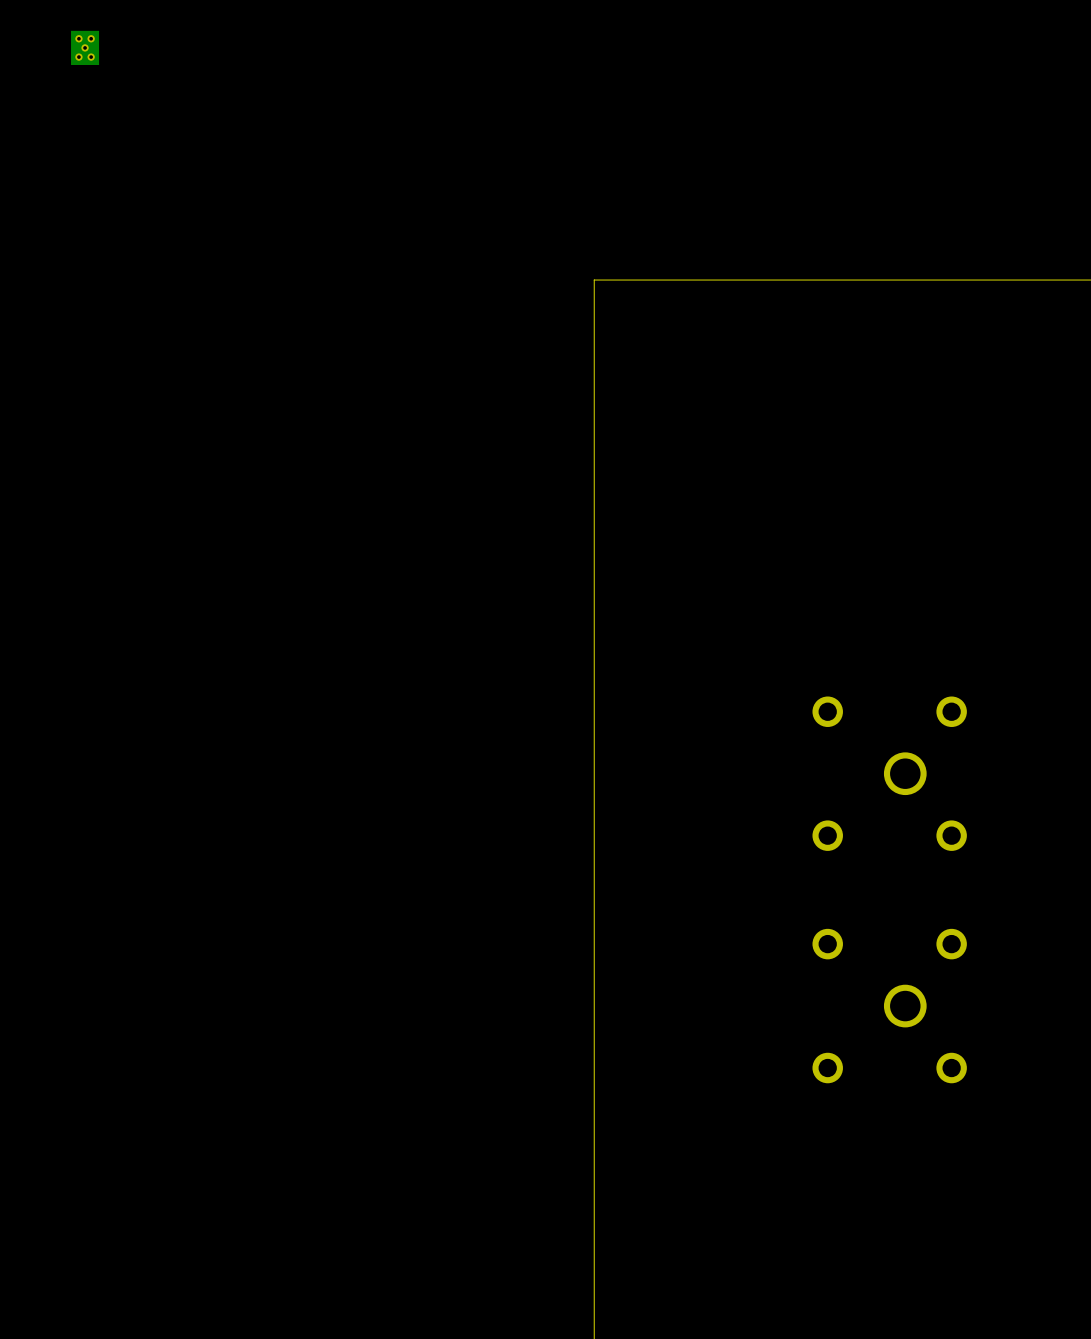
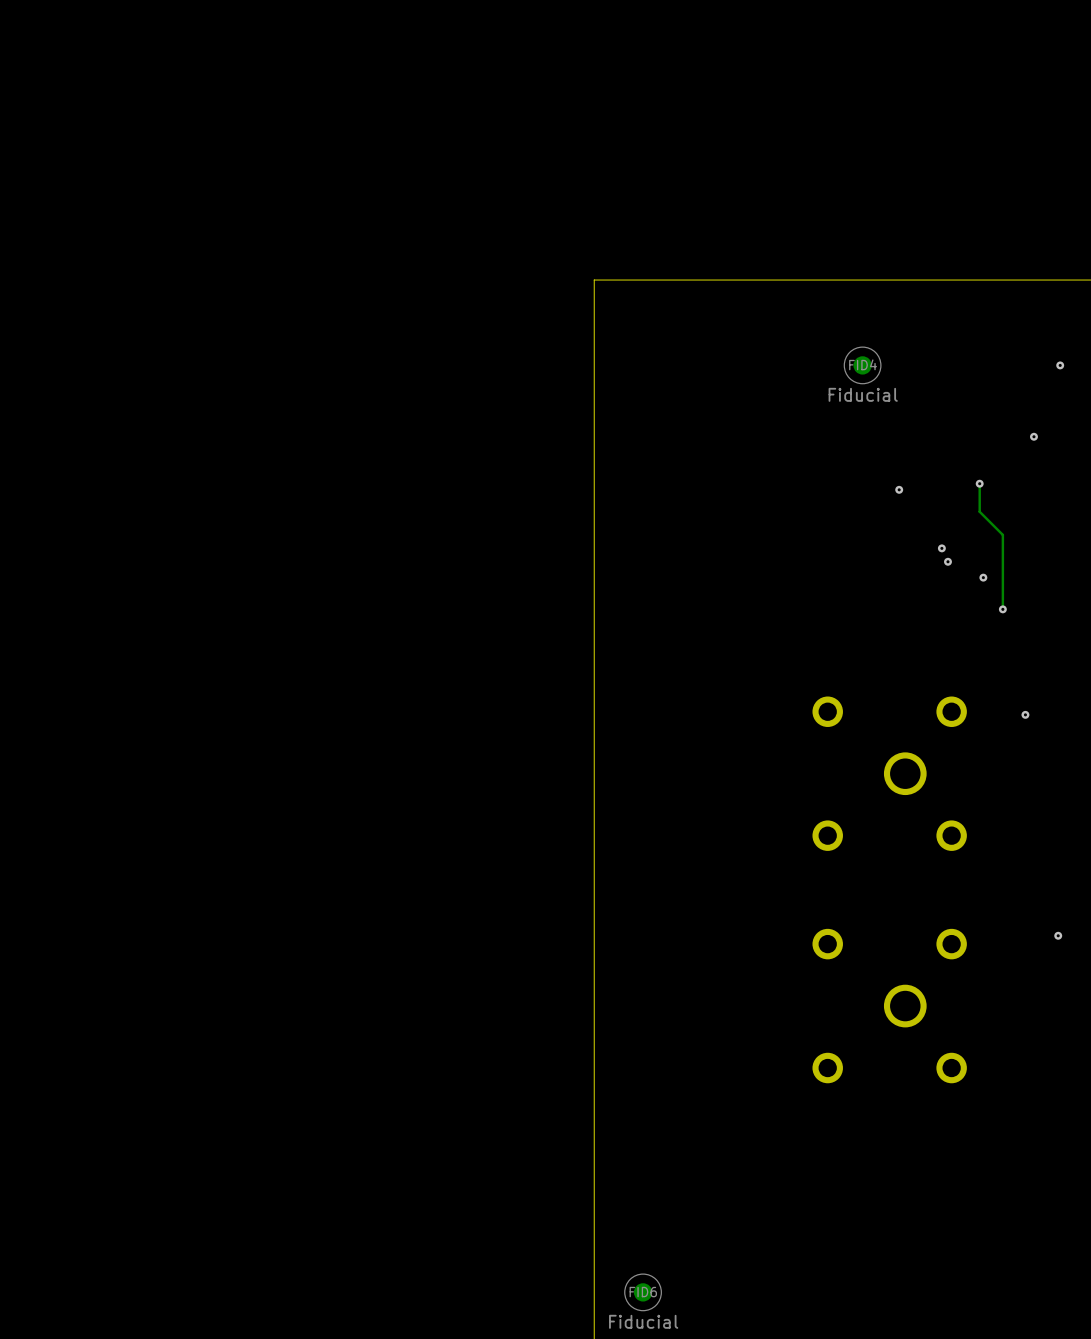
part: (85, 47) -> none
FID4: none -> Fiducial (862, 365)
via: none -> (1060, 365)
via: none -> (1033, 436)
track: none -> (979, 483) (979, 511) (1002, 534) (1002, 609)
via: none -> (979, 483)
via: none -> (899, 489)
via: none -> (941, 548)
via: none -> (947, 561)
via: none -> (983, 577)
via: none -> (1002, 609)
via: none -> (1025, 714)
via: none -> (1058, 935)
FID6: none -> Fiducial (643, 1292)

